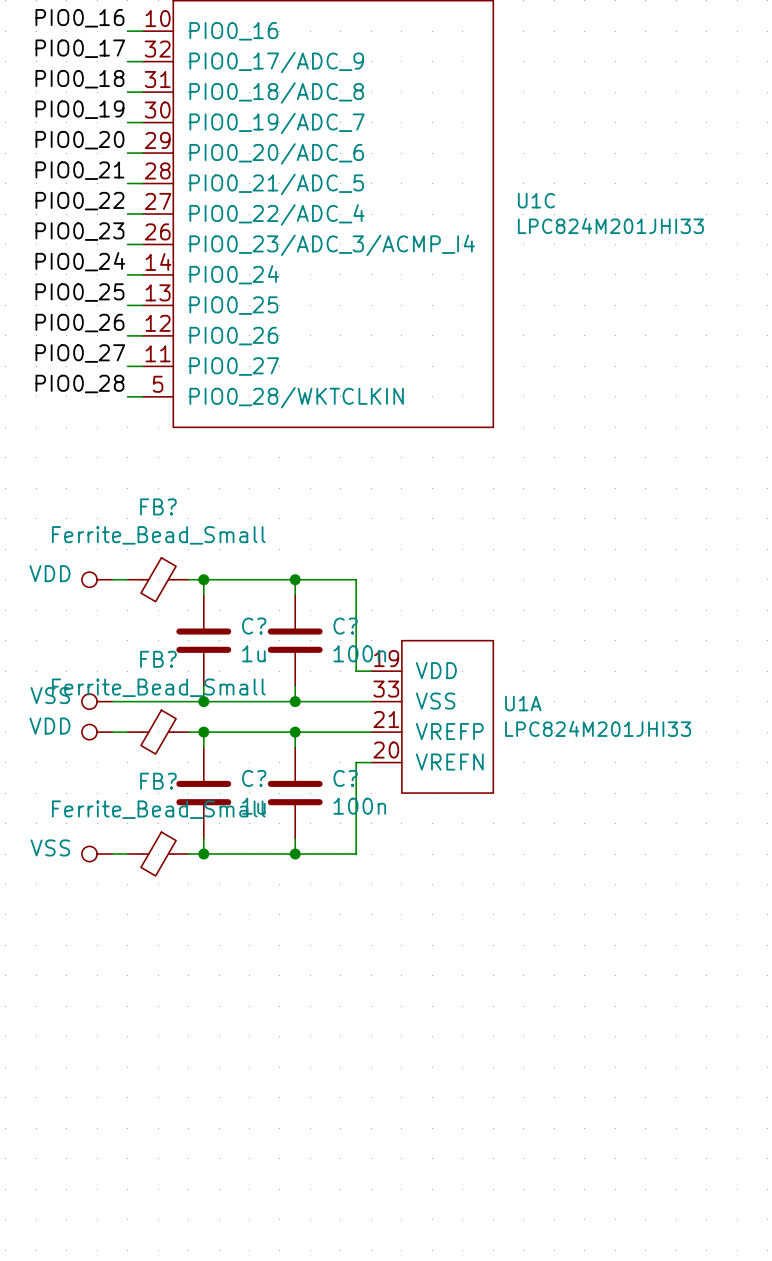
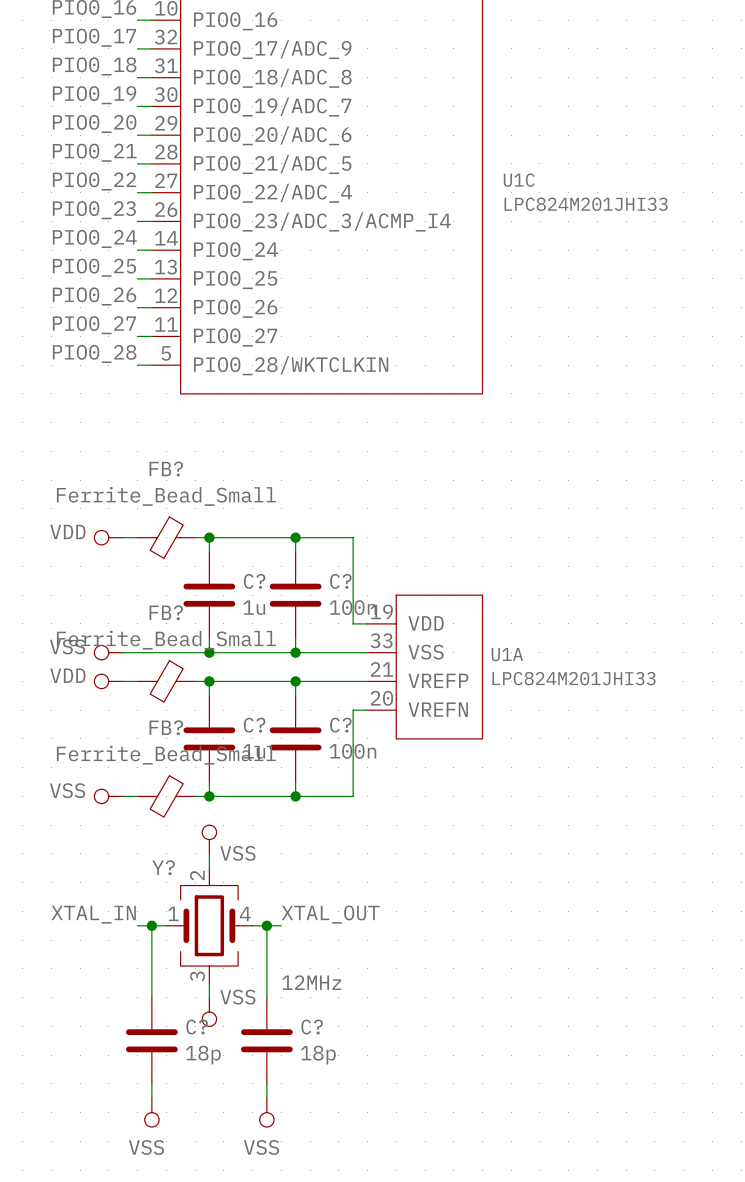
power symbol: none -> VSS (209, 839)
wire: none -> (209, 853) (209, 868)
label: none -> XTAL_IN (93, 914)
label: none -> XTAL_OUT (330, 914)
wire: none -> (137, 925) (166, 925)
wire: none -> (151, 925) (151, 997)
junction: none -> (151, 925)
Y?: none -> 12MHz (209, 925)
wire: none -> (252, 925) (281, 925)
wire: none -> (266, 925) (266, 997)
junction: none -> (266, 925)
wire: none -> (209, 983) (209, 997)
power symbol: none -> VSS (209, 1012)
C?: none -> 18p (151, 1040)
C?: none -> 18p (266, 1040)
wire: none -> (151, 1083) (151, 1098)
wire: none -> (266, 1083) (266, 1098)
power symbol: none -> VSS (151, 1112)
power symbol: none -> VSS (266, 1112)

